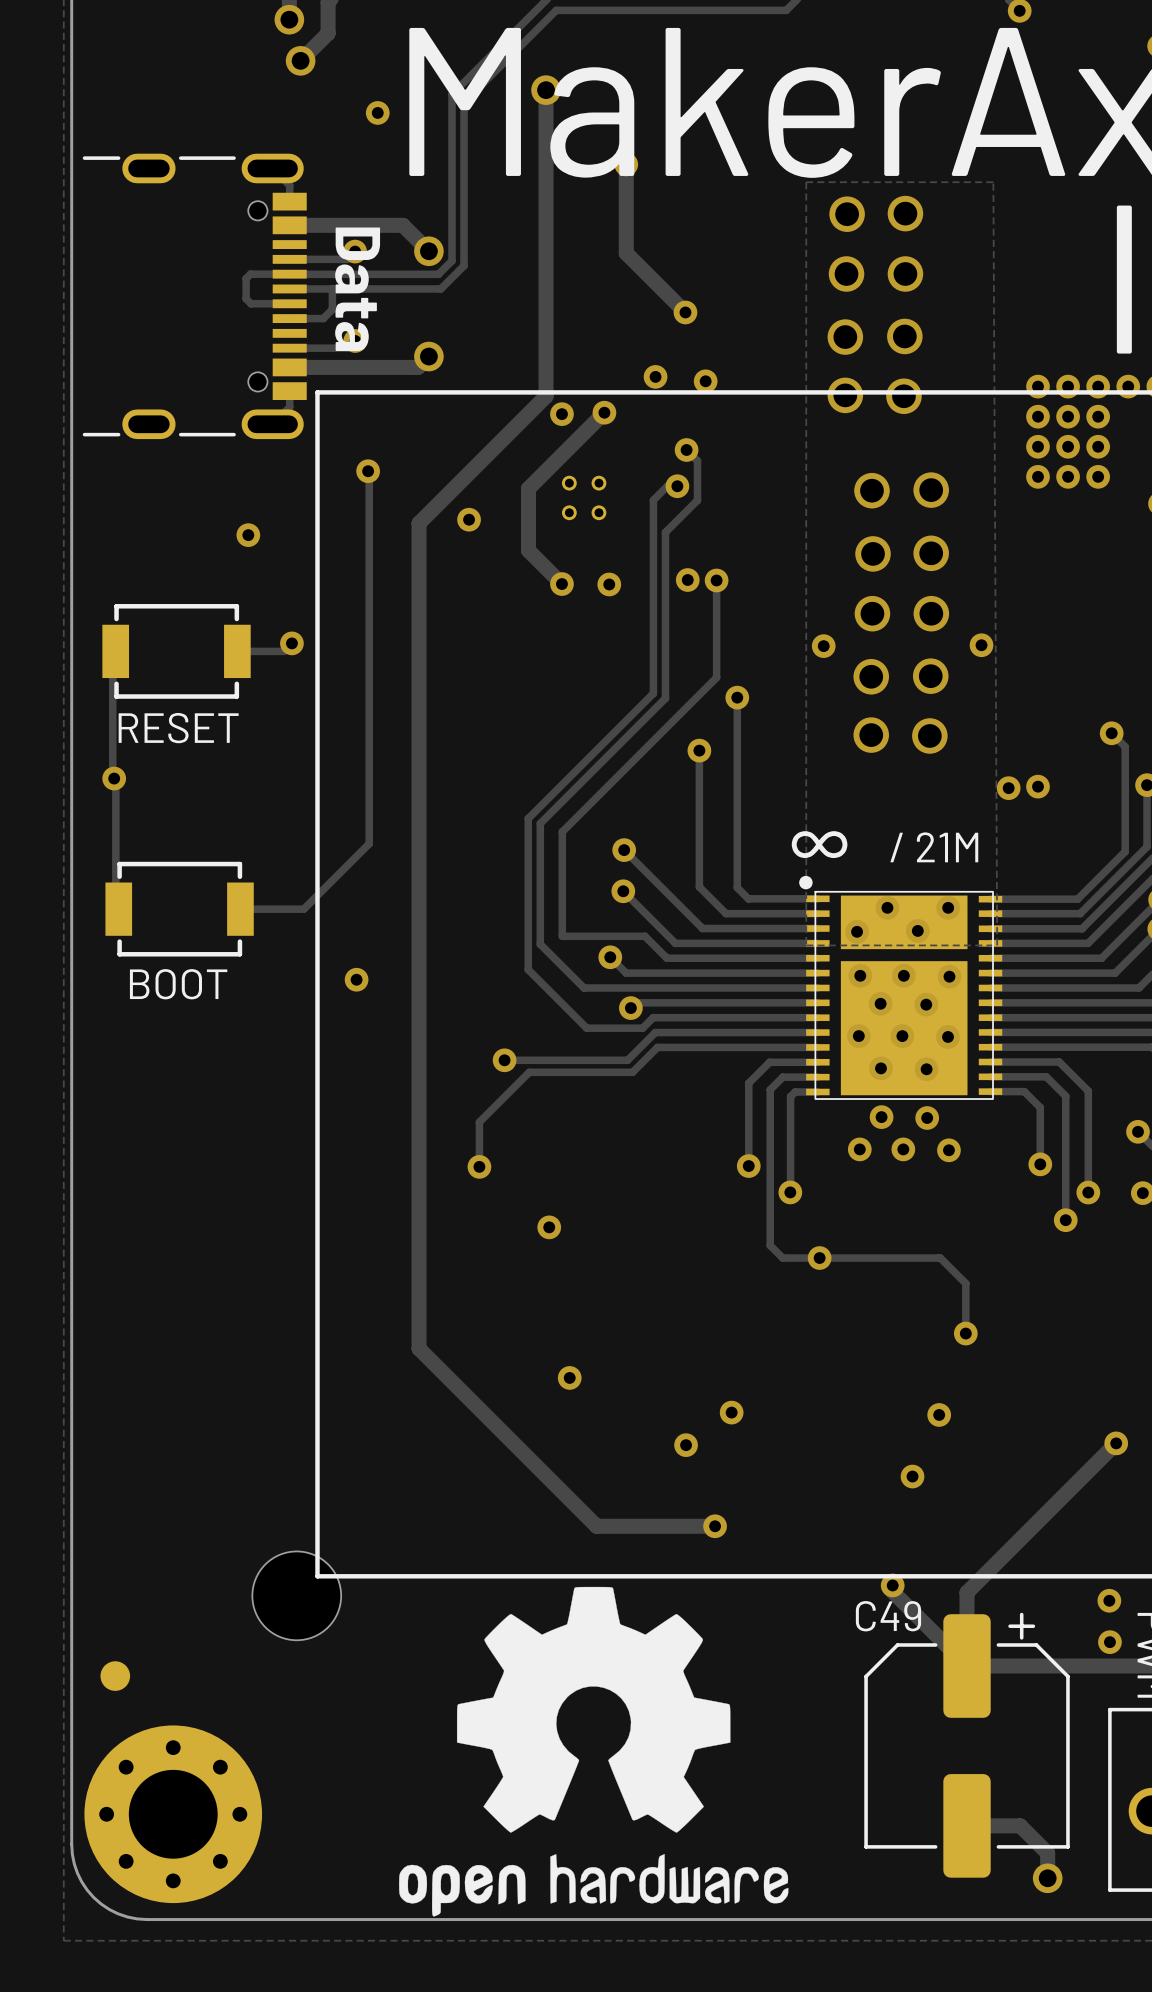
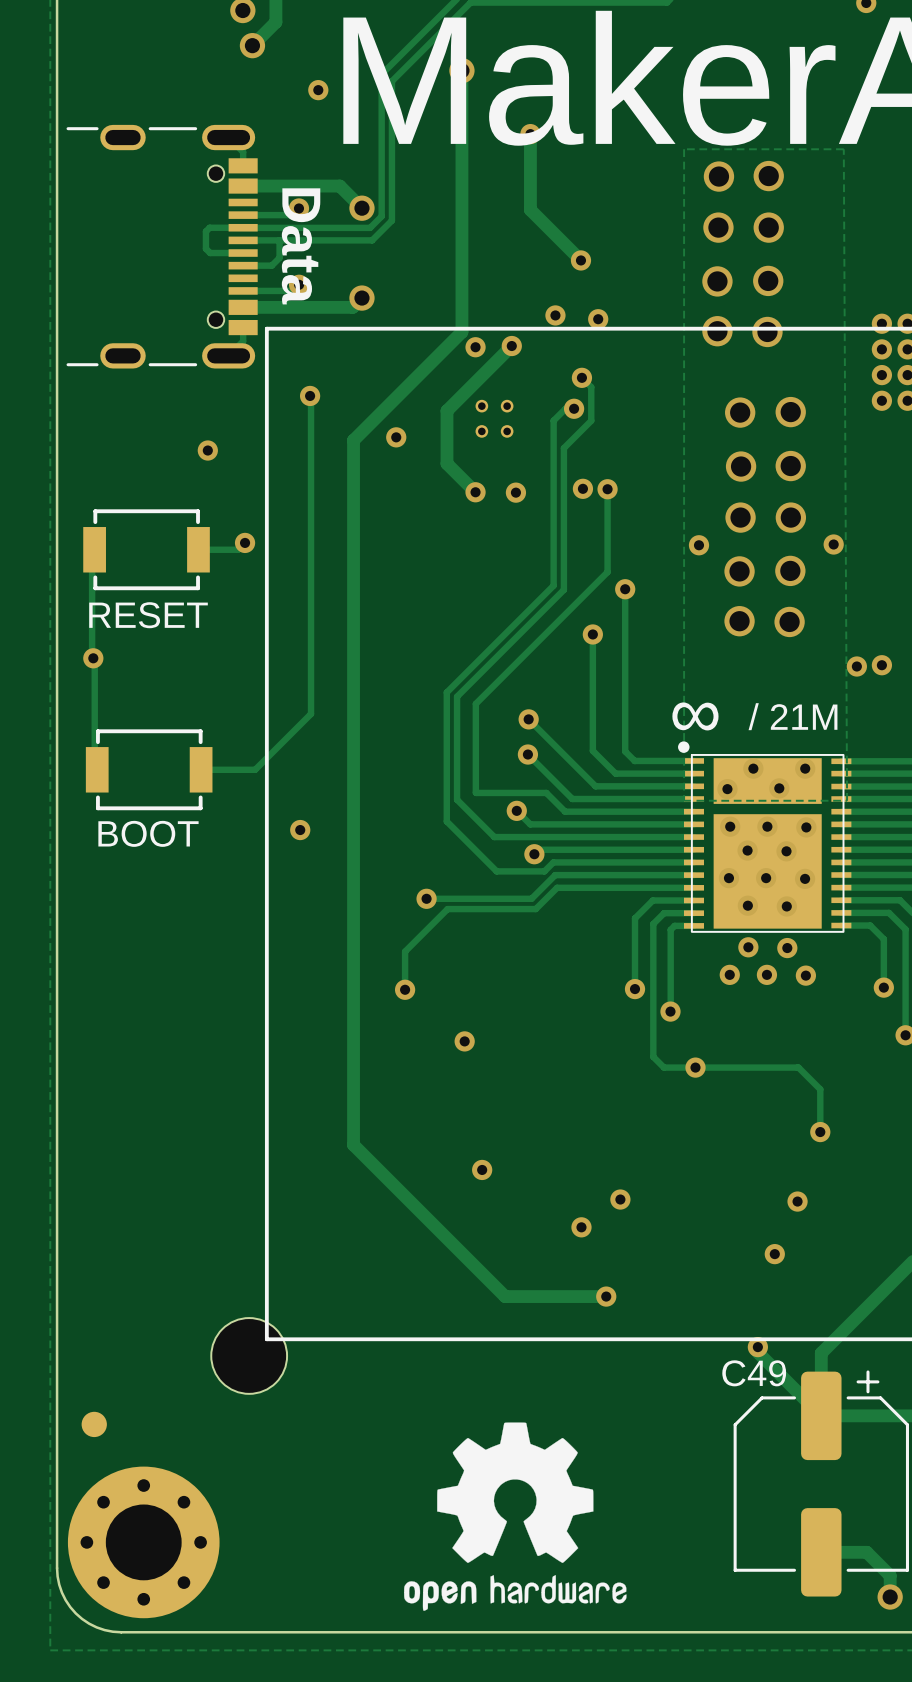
drawing: [399, 1586, 789, 1917] -> none
drawing: none -> [404, 1422, 627, 1611]

